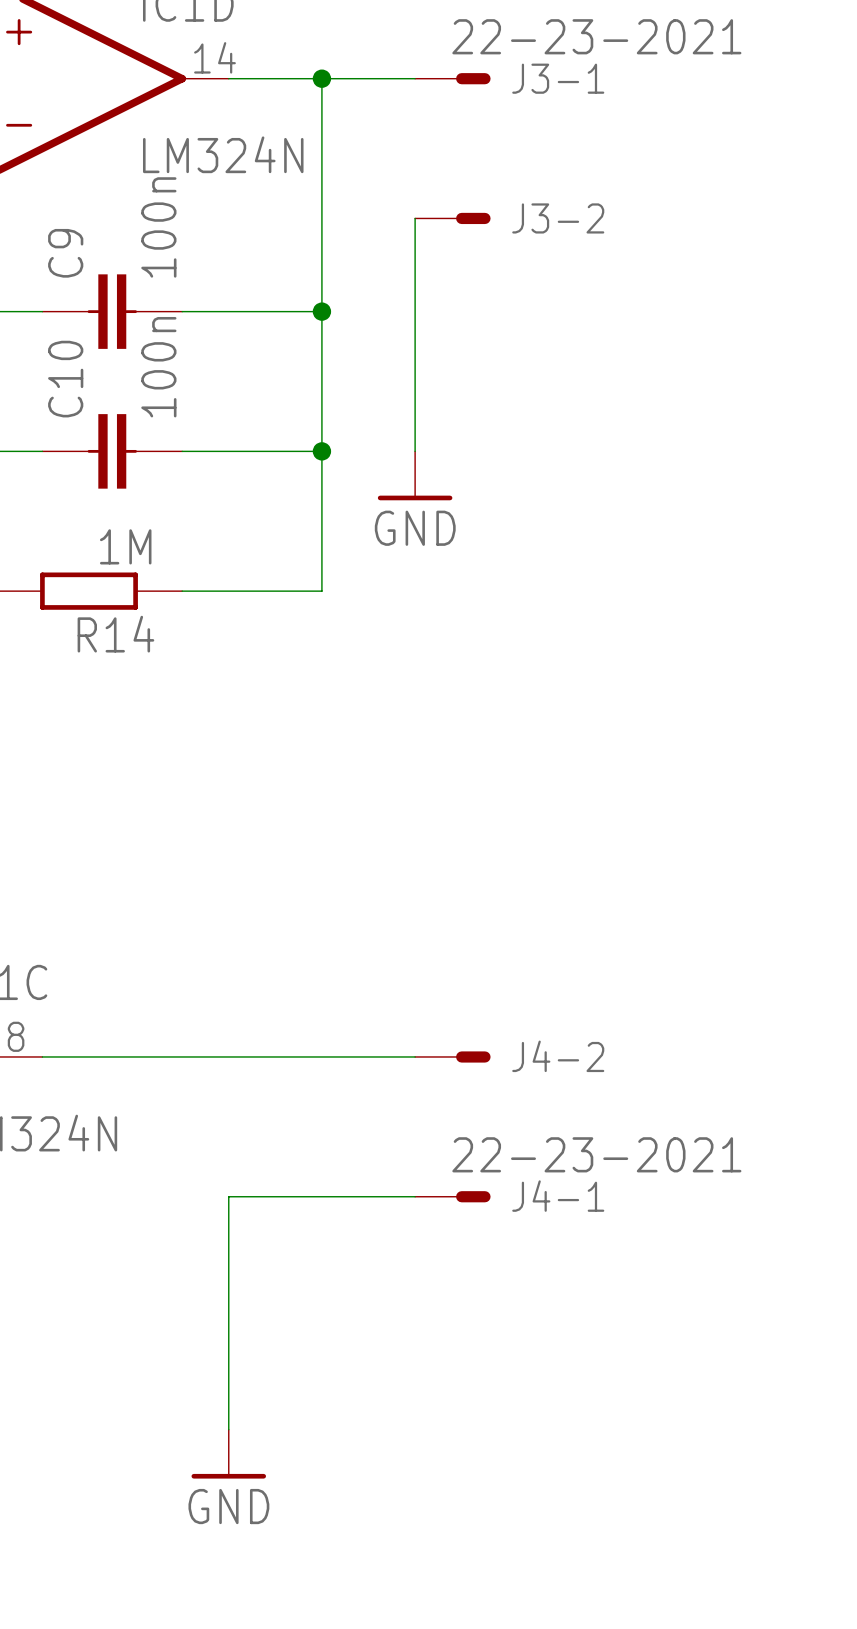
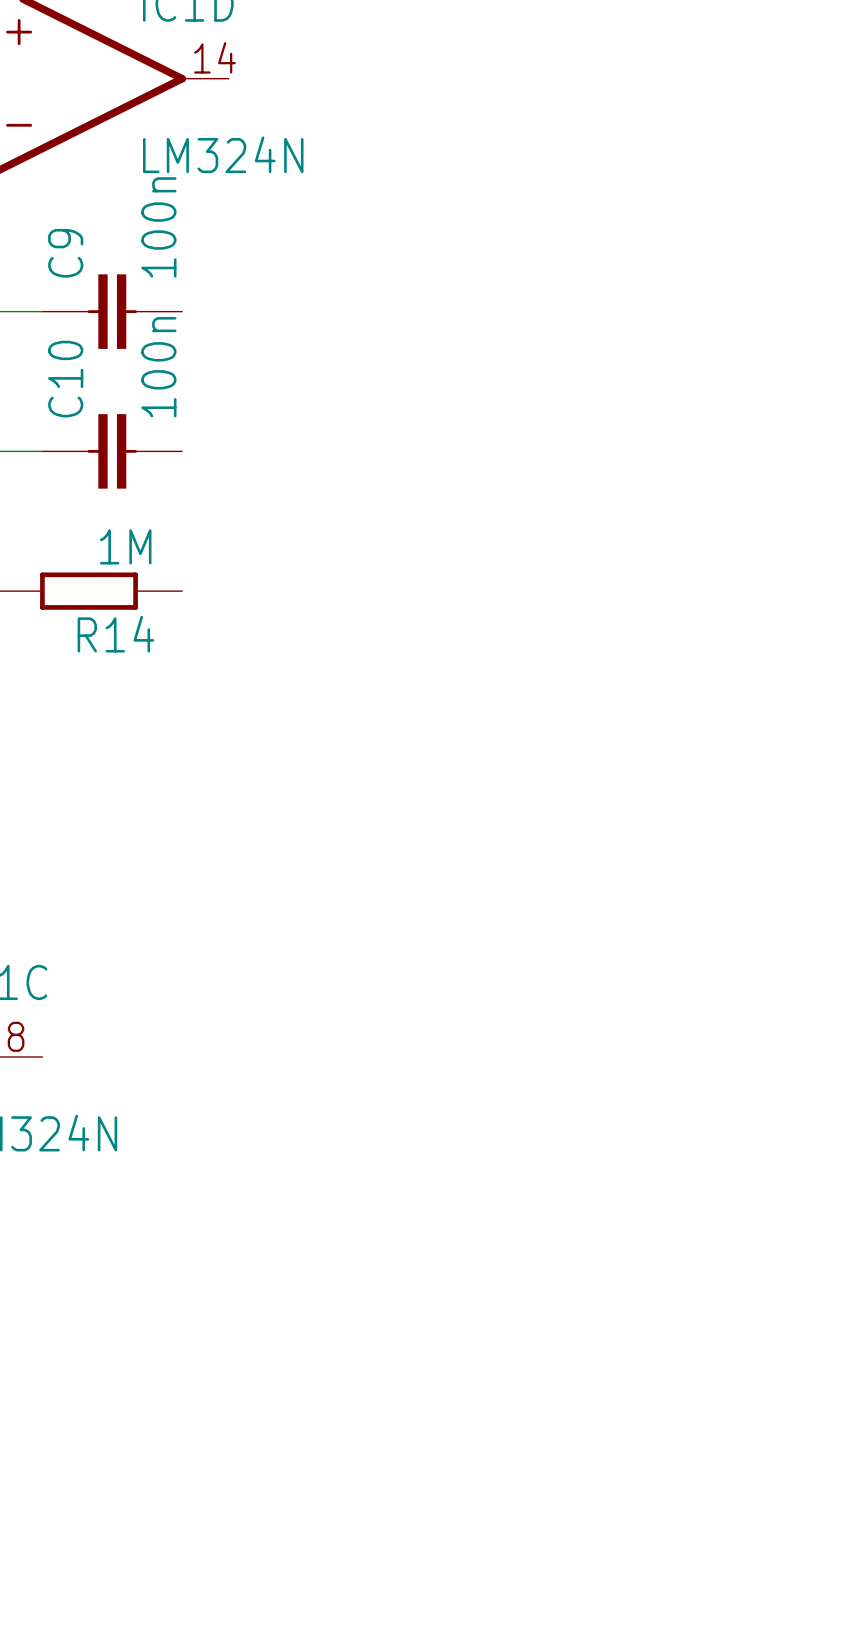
wire: (228, 78) (415, 78) -> none
wire: (321, 78) (321, 591) (182, 591) -> none
junction: (321, 78) -> none
J3-1: 22-23-2021 (452, 78) -> none
wire: (415, 218) (415, 451) -> none
J3-2: (452, 218) -> none
wire: (182, 311) (321, 311) -> none
junction: (321, 311) -> none
wire: (182, 451) (321, 451) -> none
junction: (321, 451) -> none
power symbol: GND (415, 475) -> none
wire: (42, 1056) (415, 1056) -> none
J4-2: (452, 1056) -> none
wire: (415, 1196) (228, 1196) (228, 1429) -> none
J4-1: 22-23-2021 (452, 1196) -> none
power symbol: GND (228, 1454) -> none

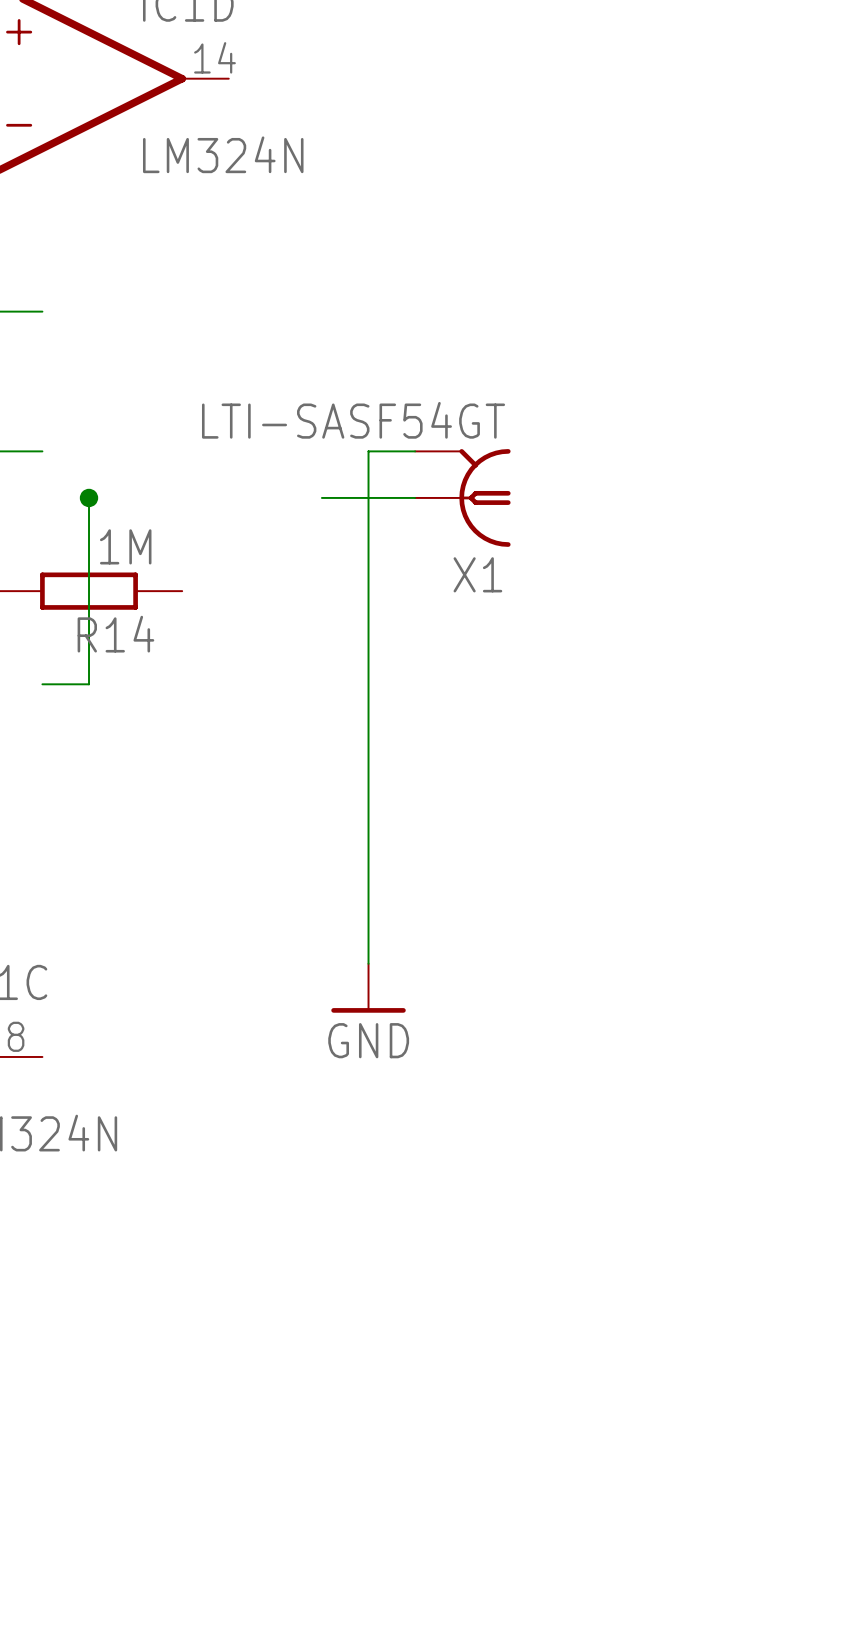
C9: 100n (112, 311) -> none
C10: 100n (112, 451) -> none
wire: none -> (415, 451) (368, 451) (368, 963)
wire: none -> (89, 497) (89, 684) (42, 684)
junction: none -> (89, 497)
wire: none -> (321, 497) (415, 497)
X1: none -> LTI-SASF54GT (462, 497)
power symbol: none -> GND (368, 988)

